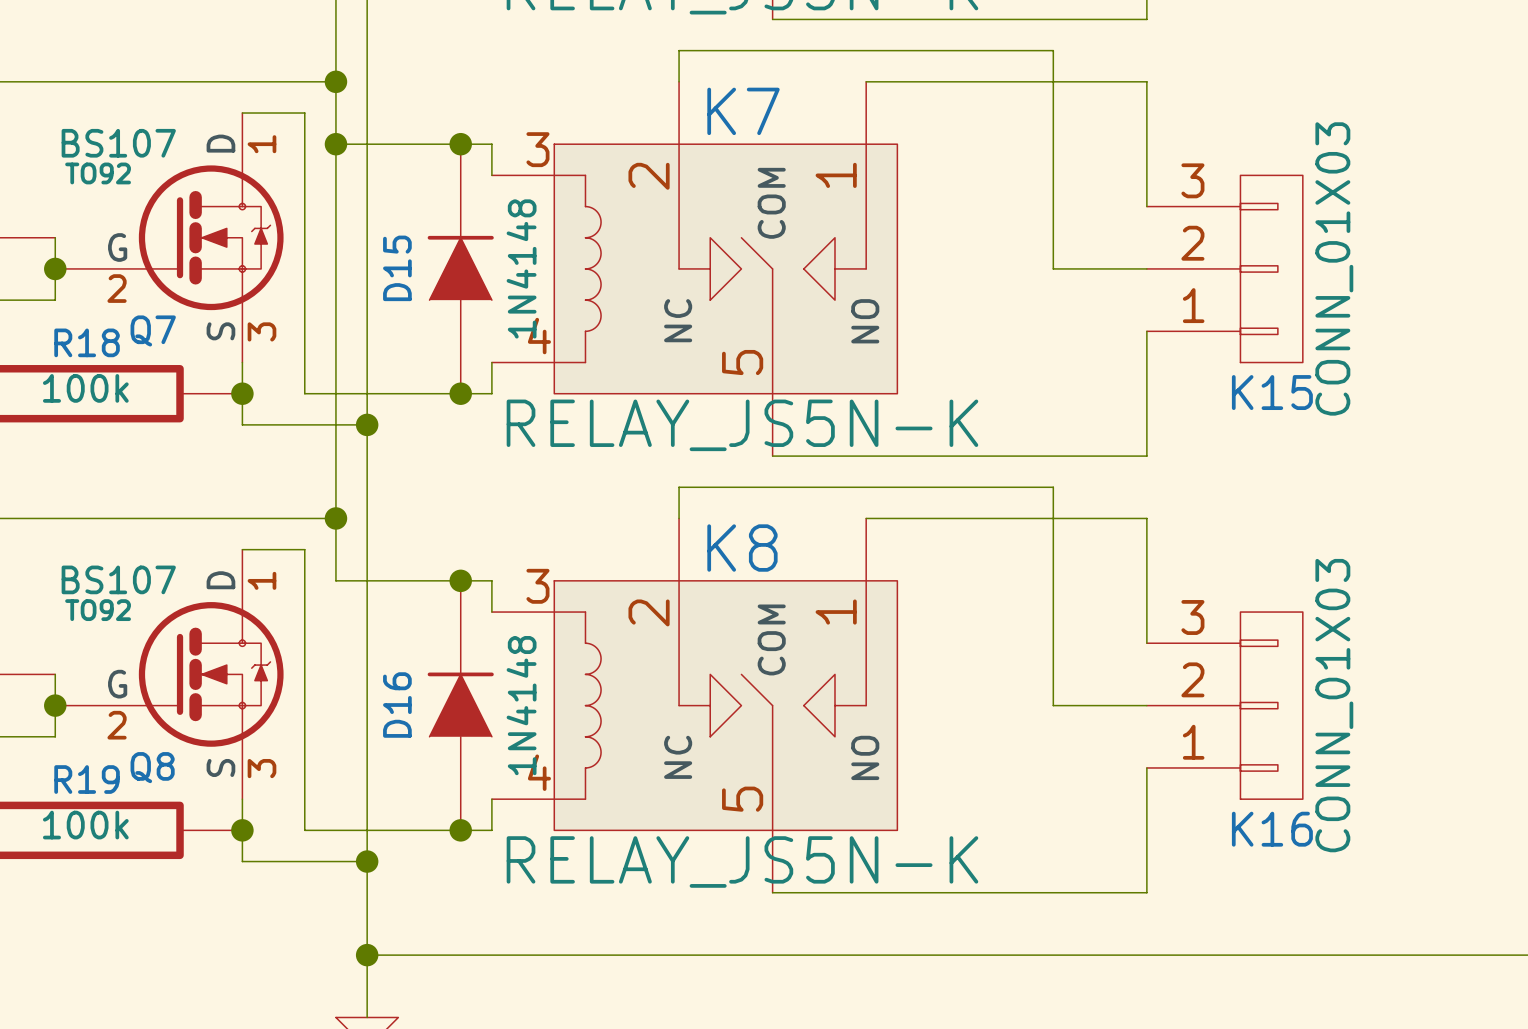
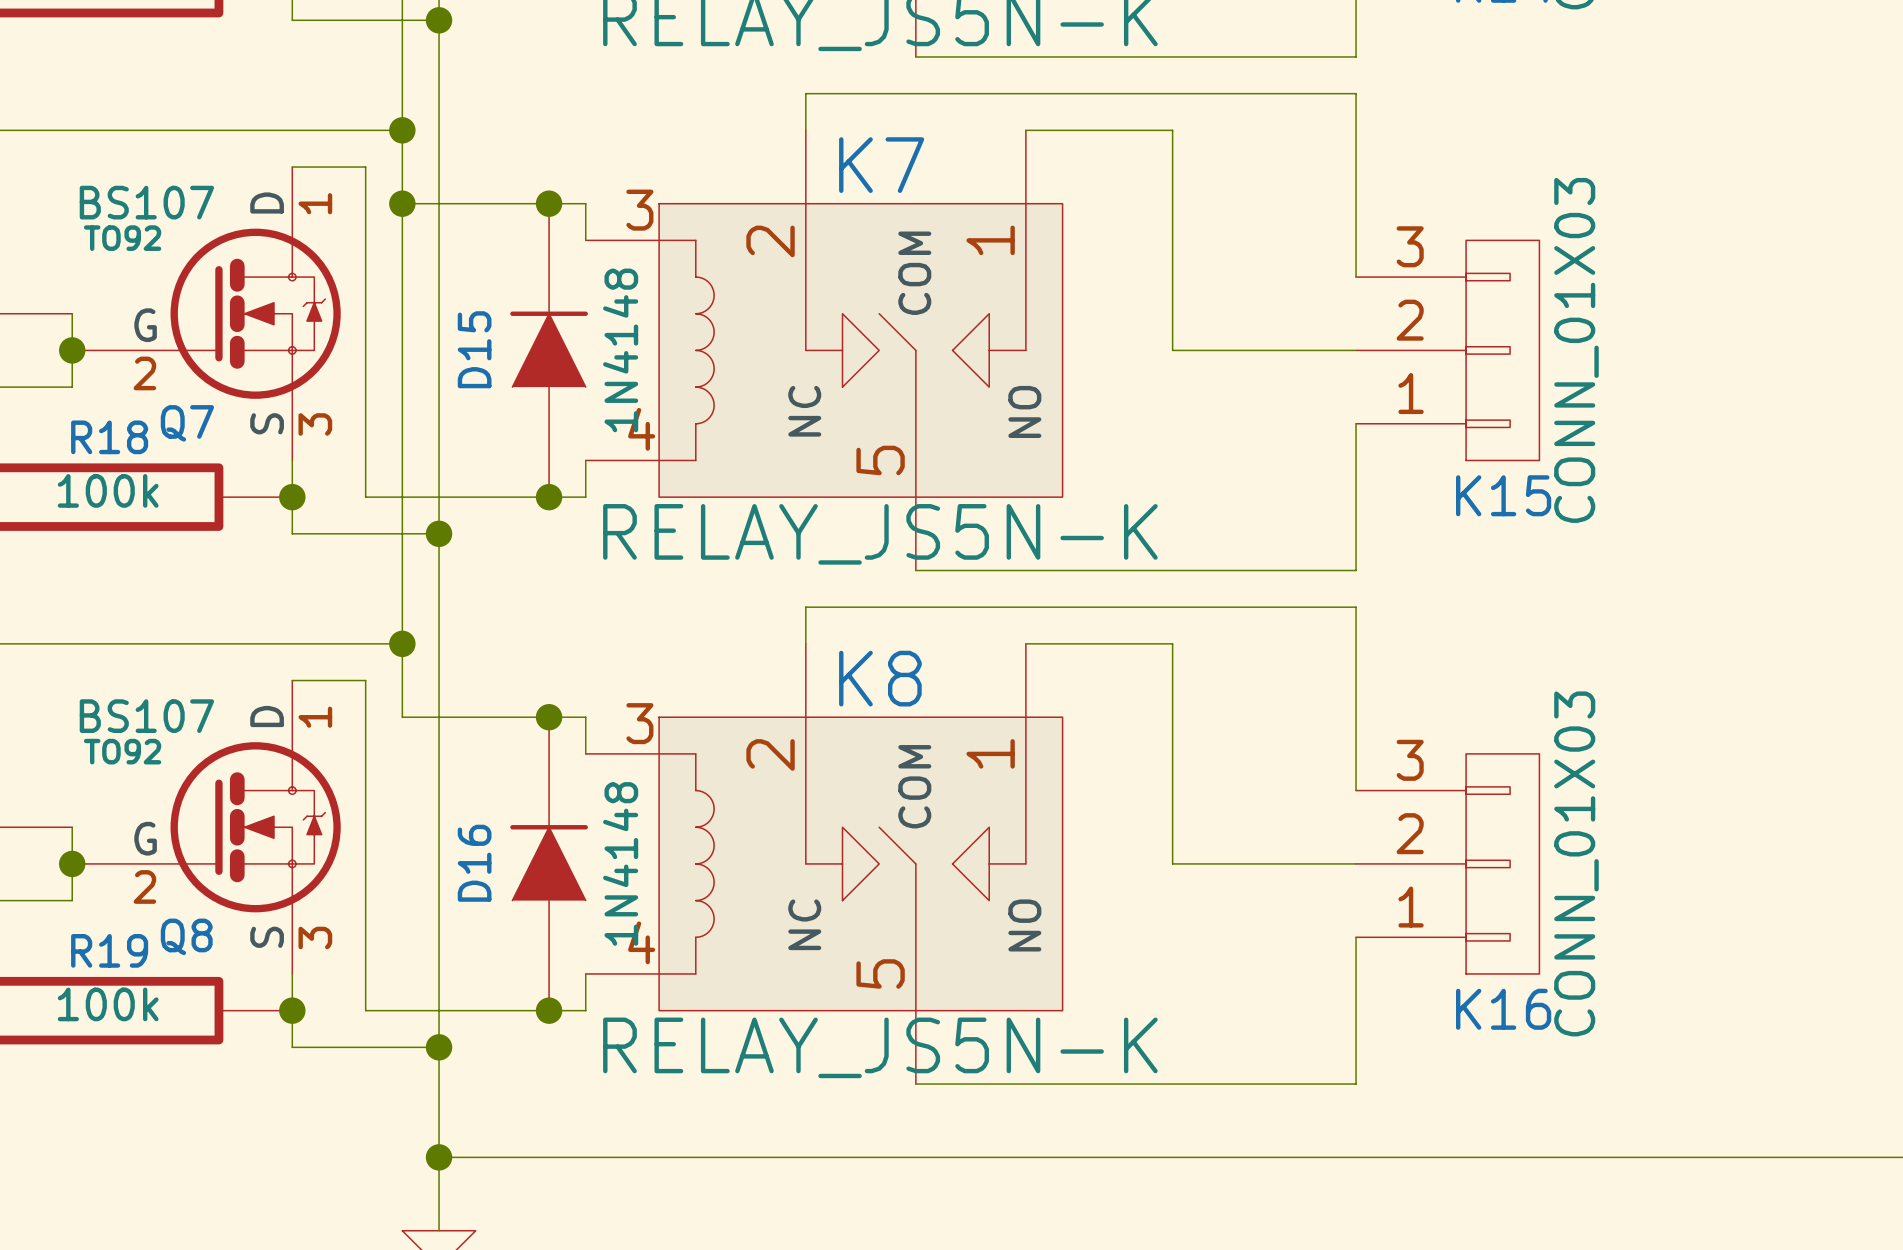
wire: (1053, 50) (1053, 268) -> (1172, 130) (1172, 350) (1245, 350)
wire: (990, 81) (1146, 81) -> (1245, 93) (1356, 93) (1356, 130)
wire: (1053, 487) (1053, 705) -> (1172, 643) (1172, 863) (1245, 863)
wire: (990, 518) (1146, 518) -> (1245, 607) (1356, 607) (1356, 643)

